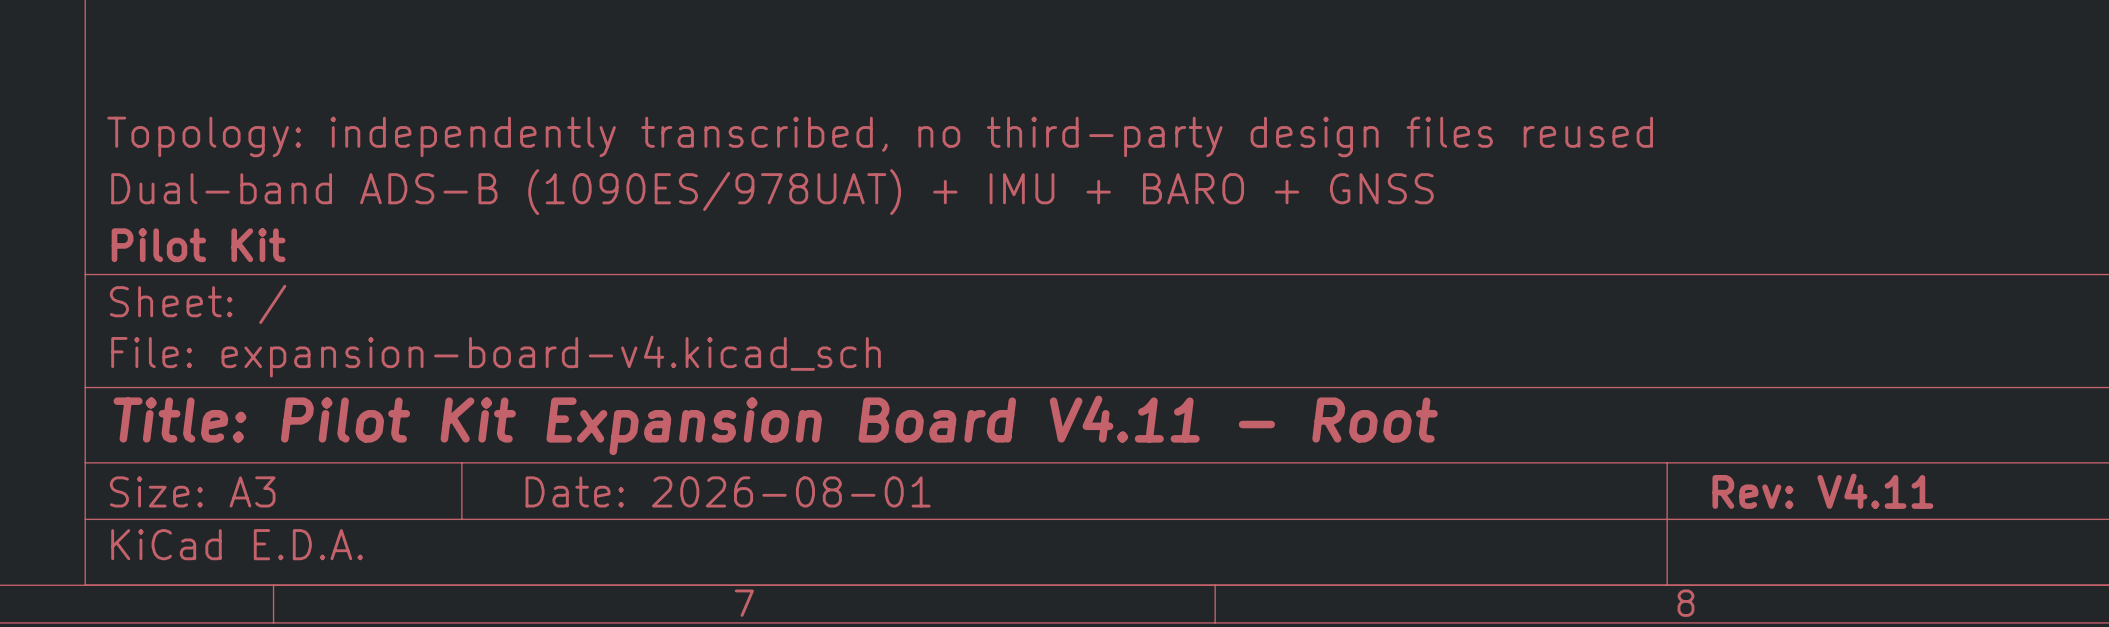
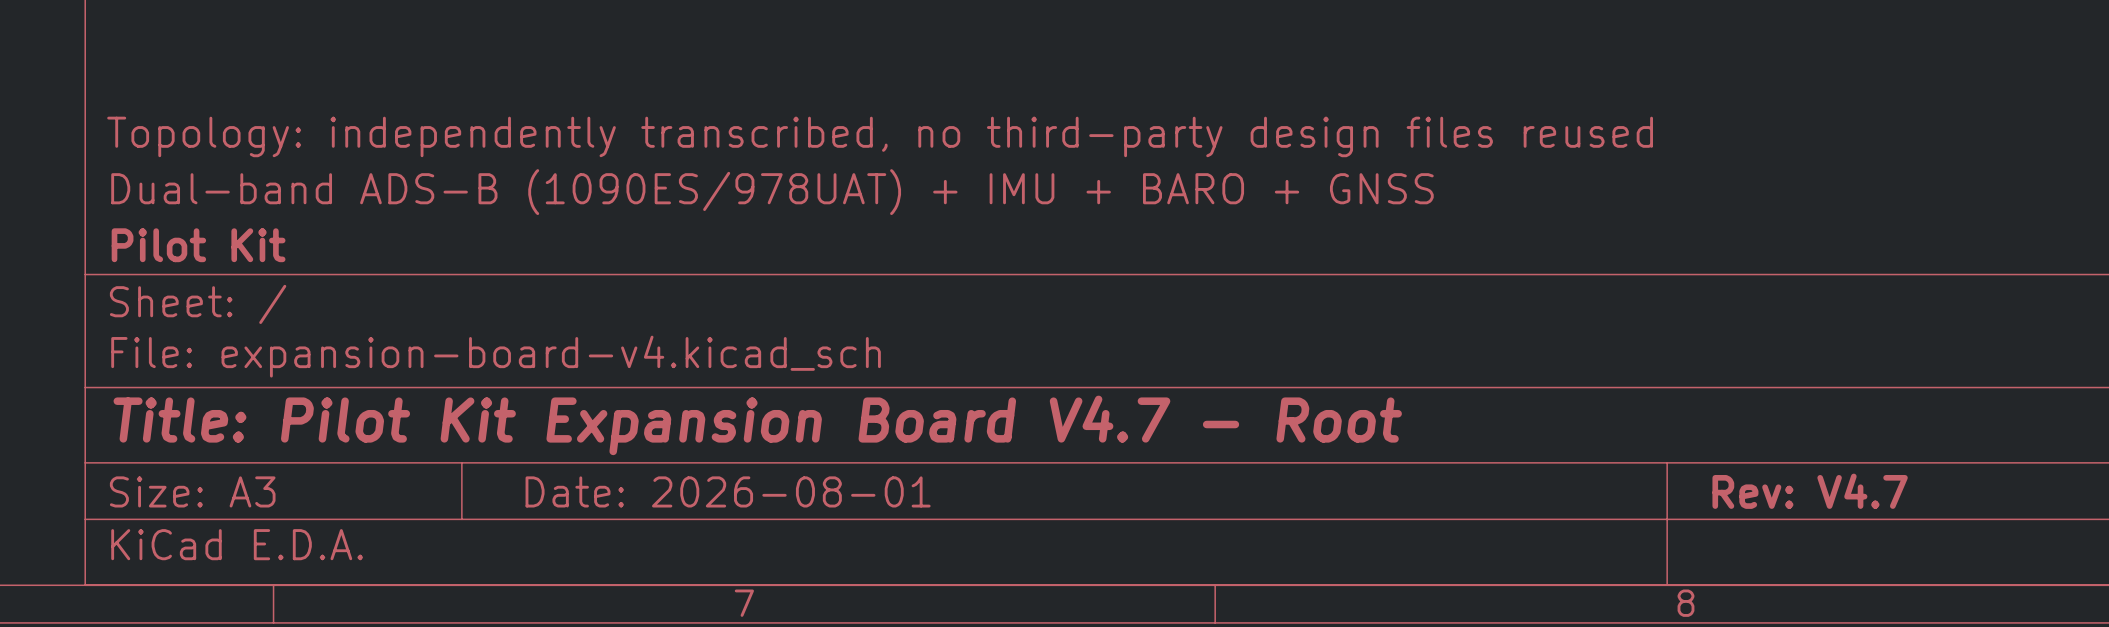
title block: Title: Pilot Kit Expansion Board V4.11 - Root (775, 425) -> Title: Pilot Kit Expansion Board V4.7 - Root (757, 425)
title block: Rev: V4.11 (1822, 491) -> Rev: V4.7 (1810, 491)

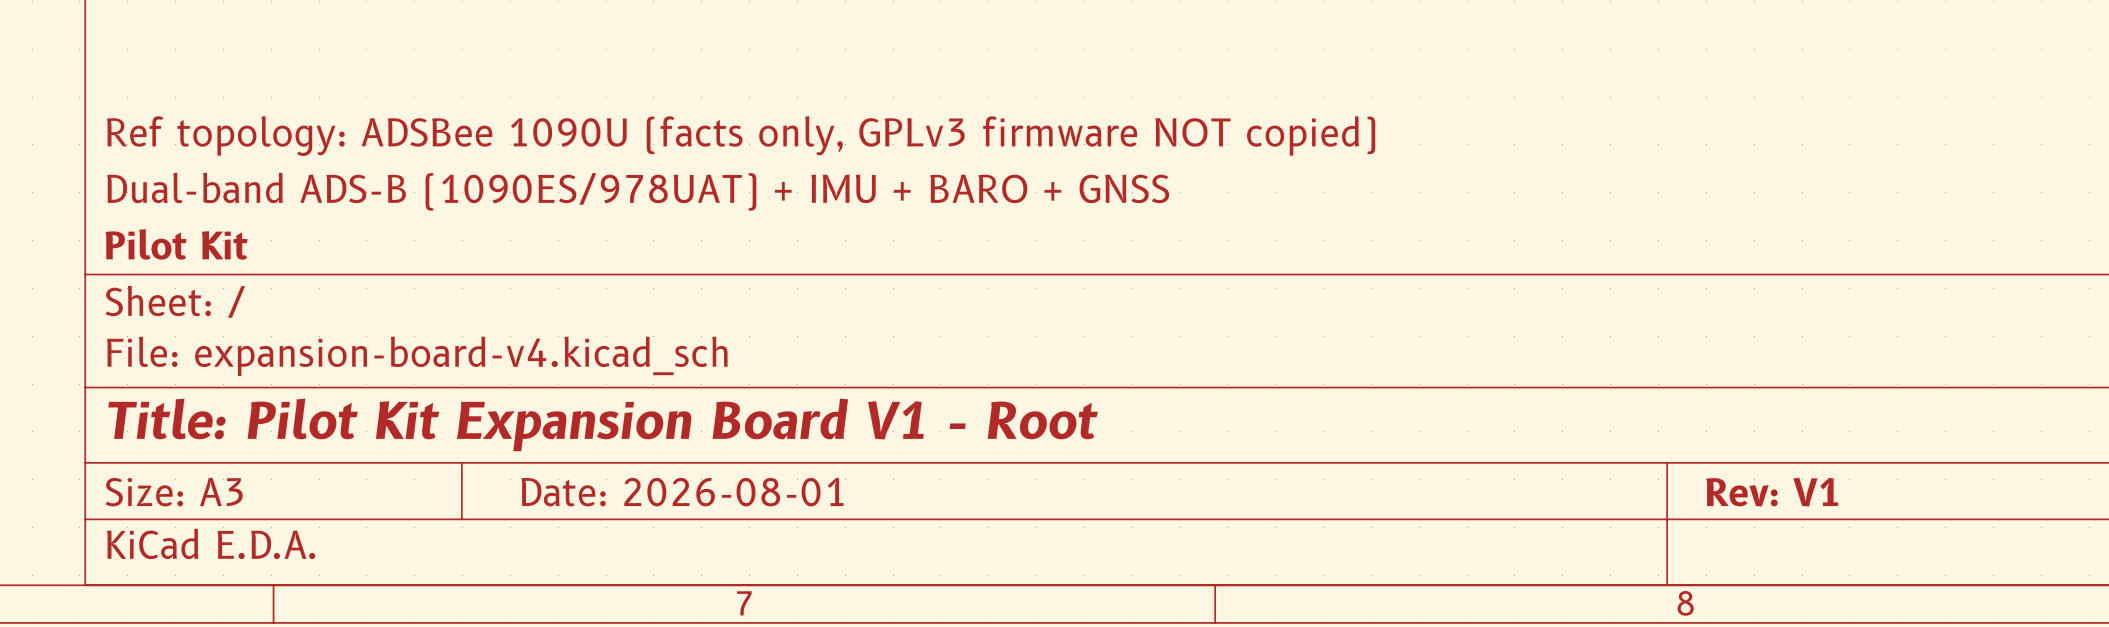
title block: Topology: independently transcribed, no third-party design files reused (880, 136) -> Ref topology: ADSBee 1090U (facts only, GPLv3 firmware NOT copied) (741, 136)
title block: Title: Pilot Kit Expansion Board V4.7 - Root (757, 425) -> Title: Pilot Kit Expansion Board V1 - Root (603, 424)
title block: Rev: V4.7 (1810, 491) -> Rev: V1 (1772, 492)

